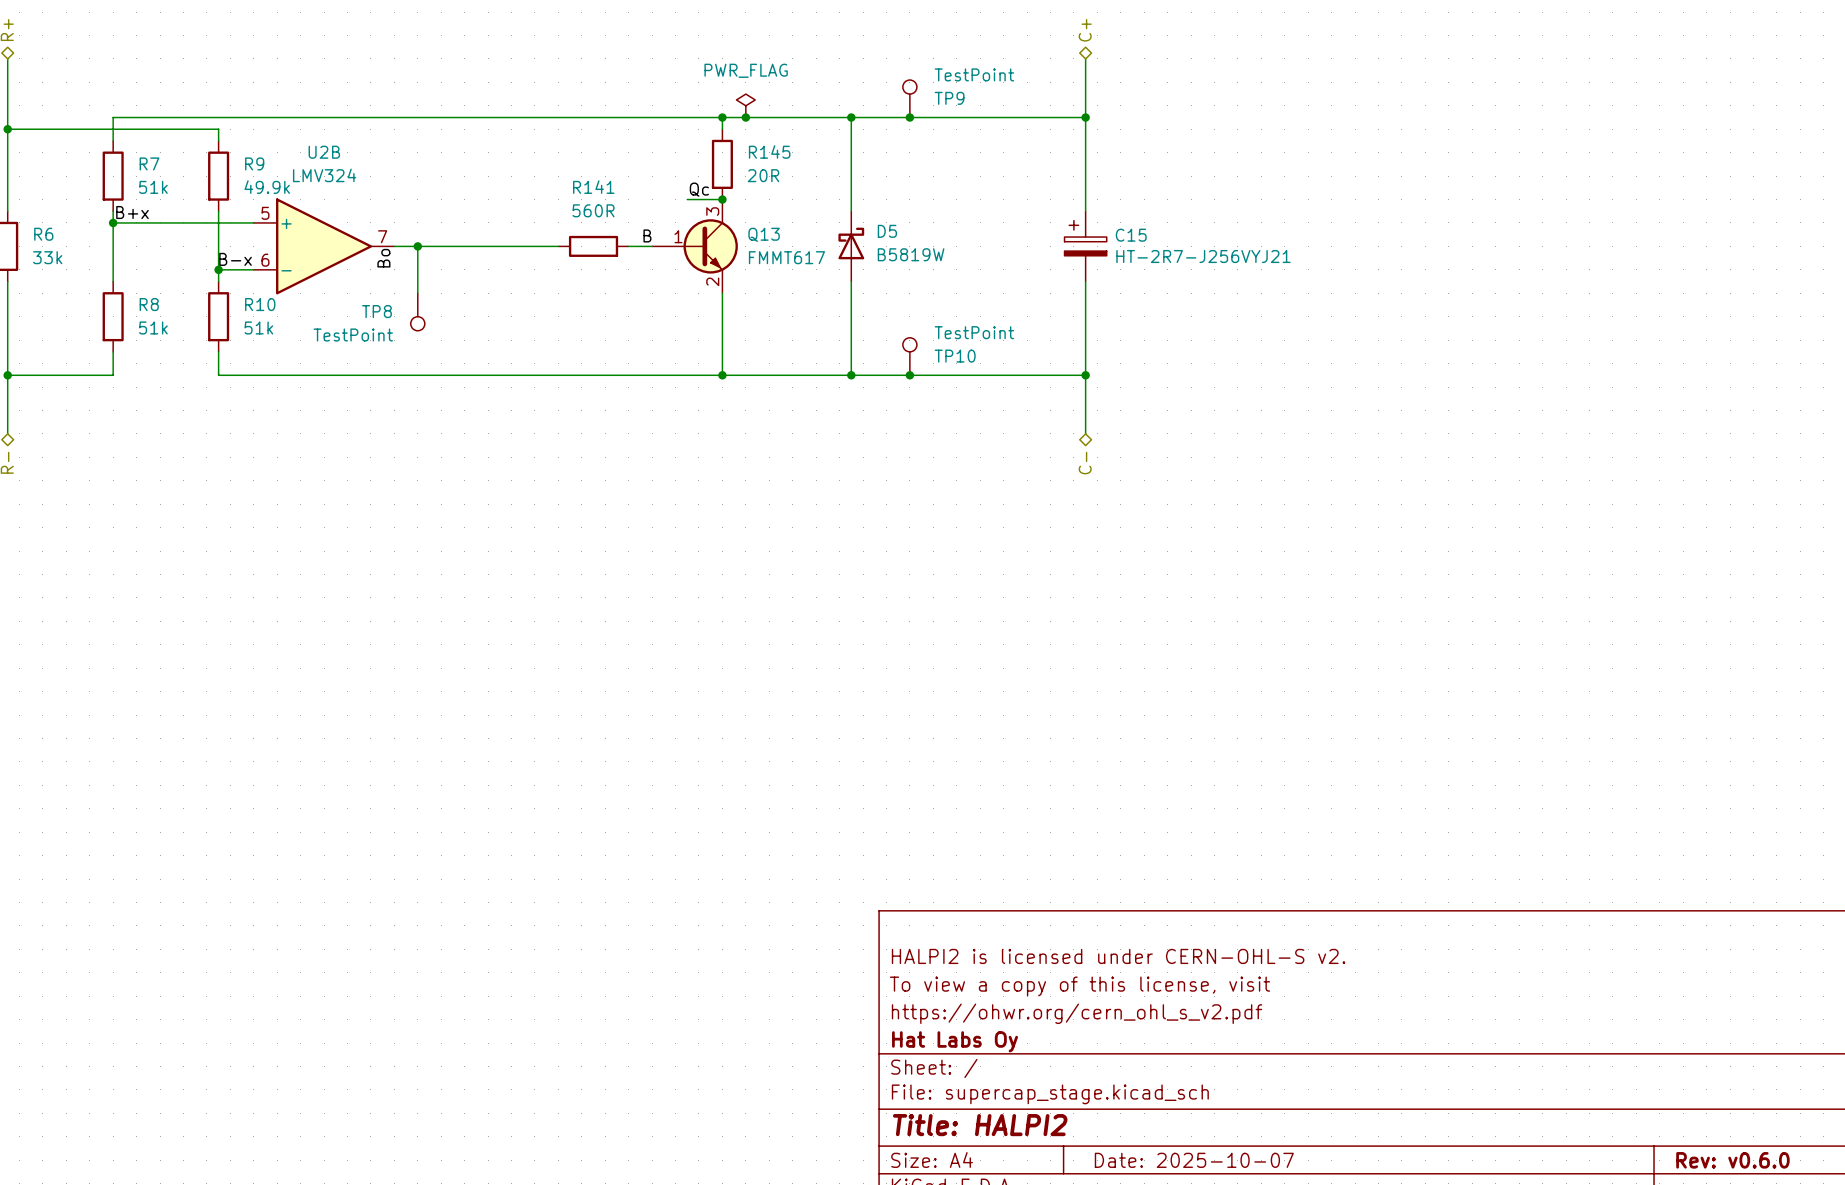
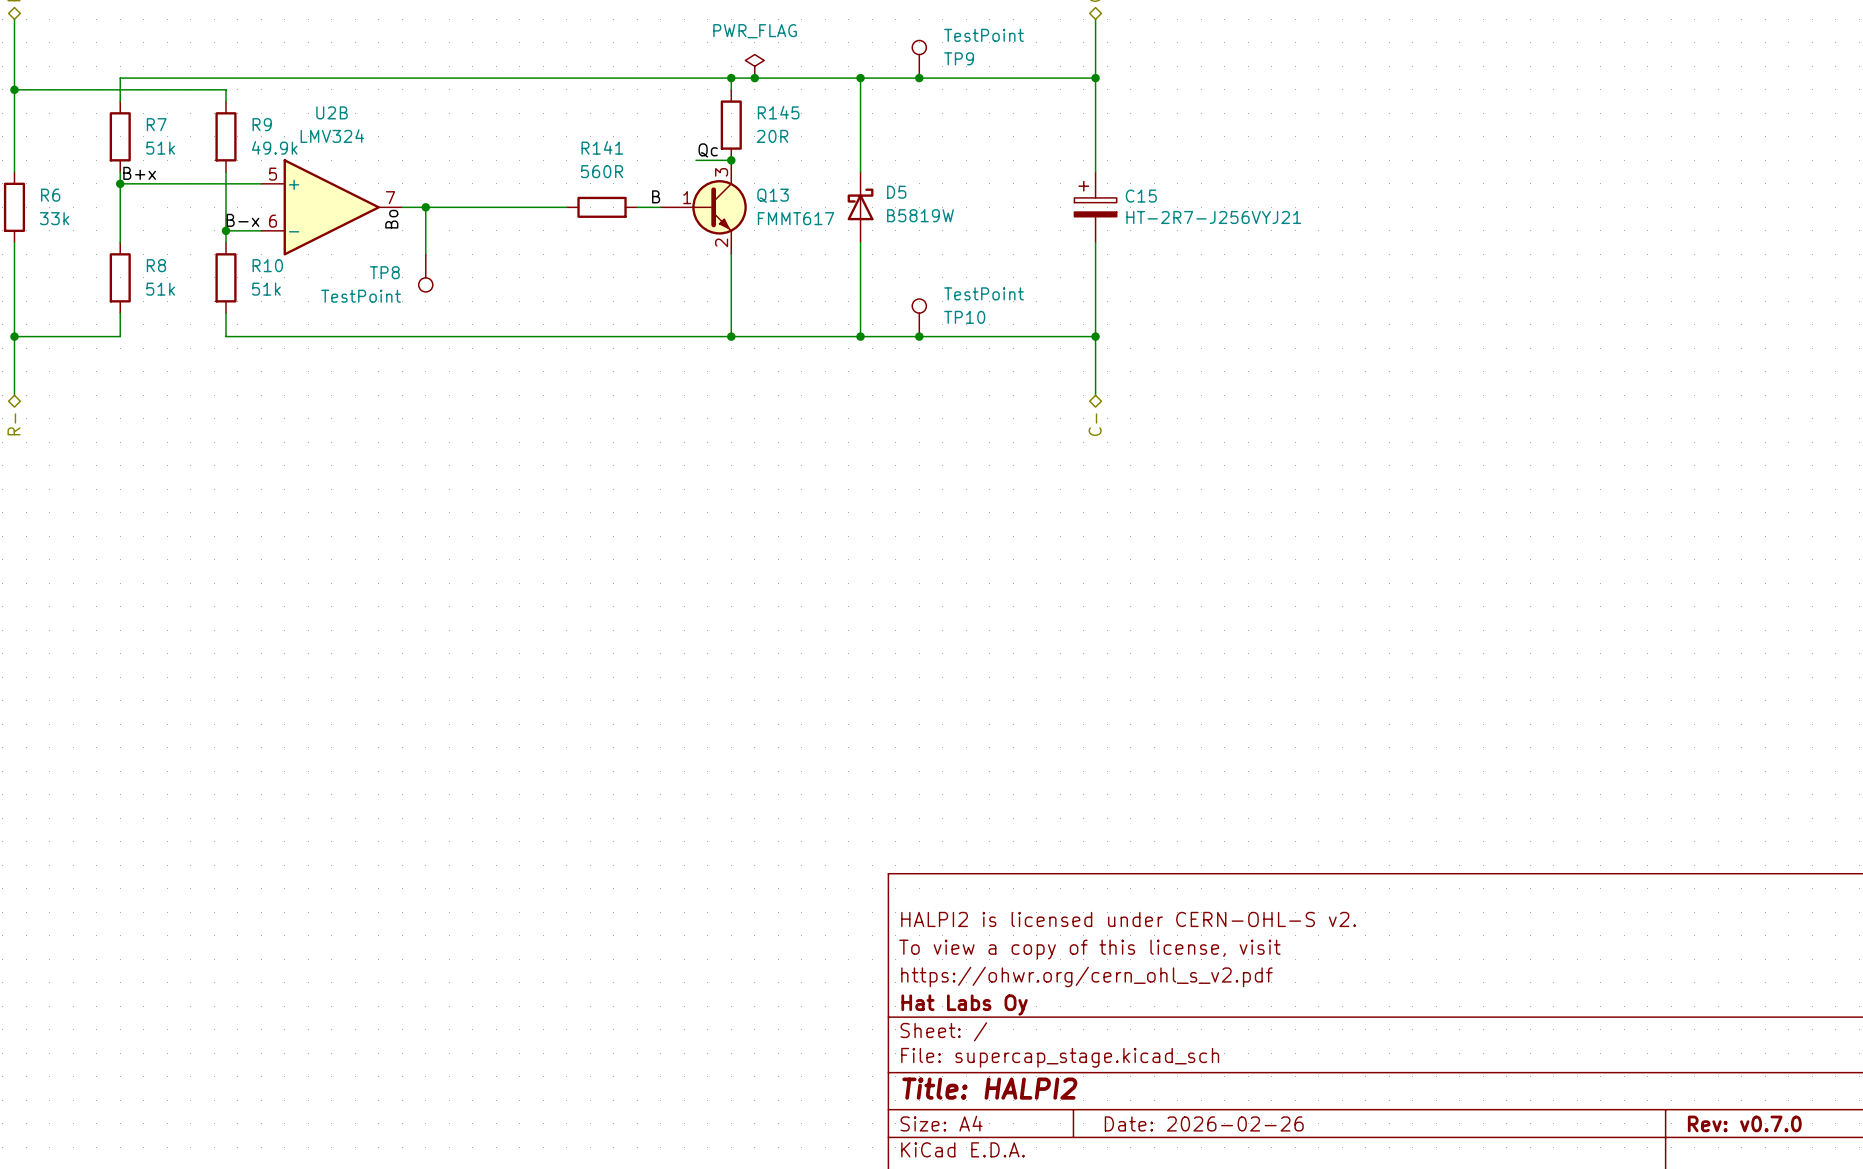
title block: Date: 2025-10-07 (1194, 1160) -> Date: 2026-02-26 (1204, 1123)
title block: Rev: v0.6.0 (1732, 1160) -> Rev: v0.7.0 (1744, 1123)

